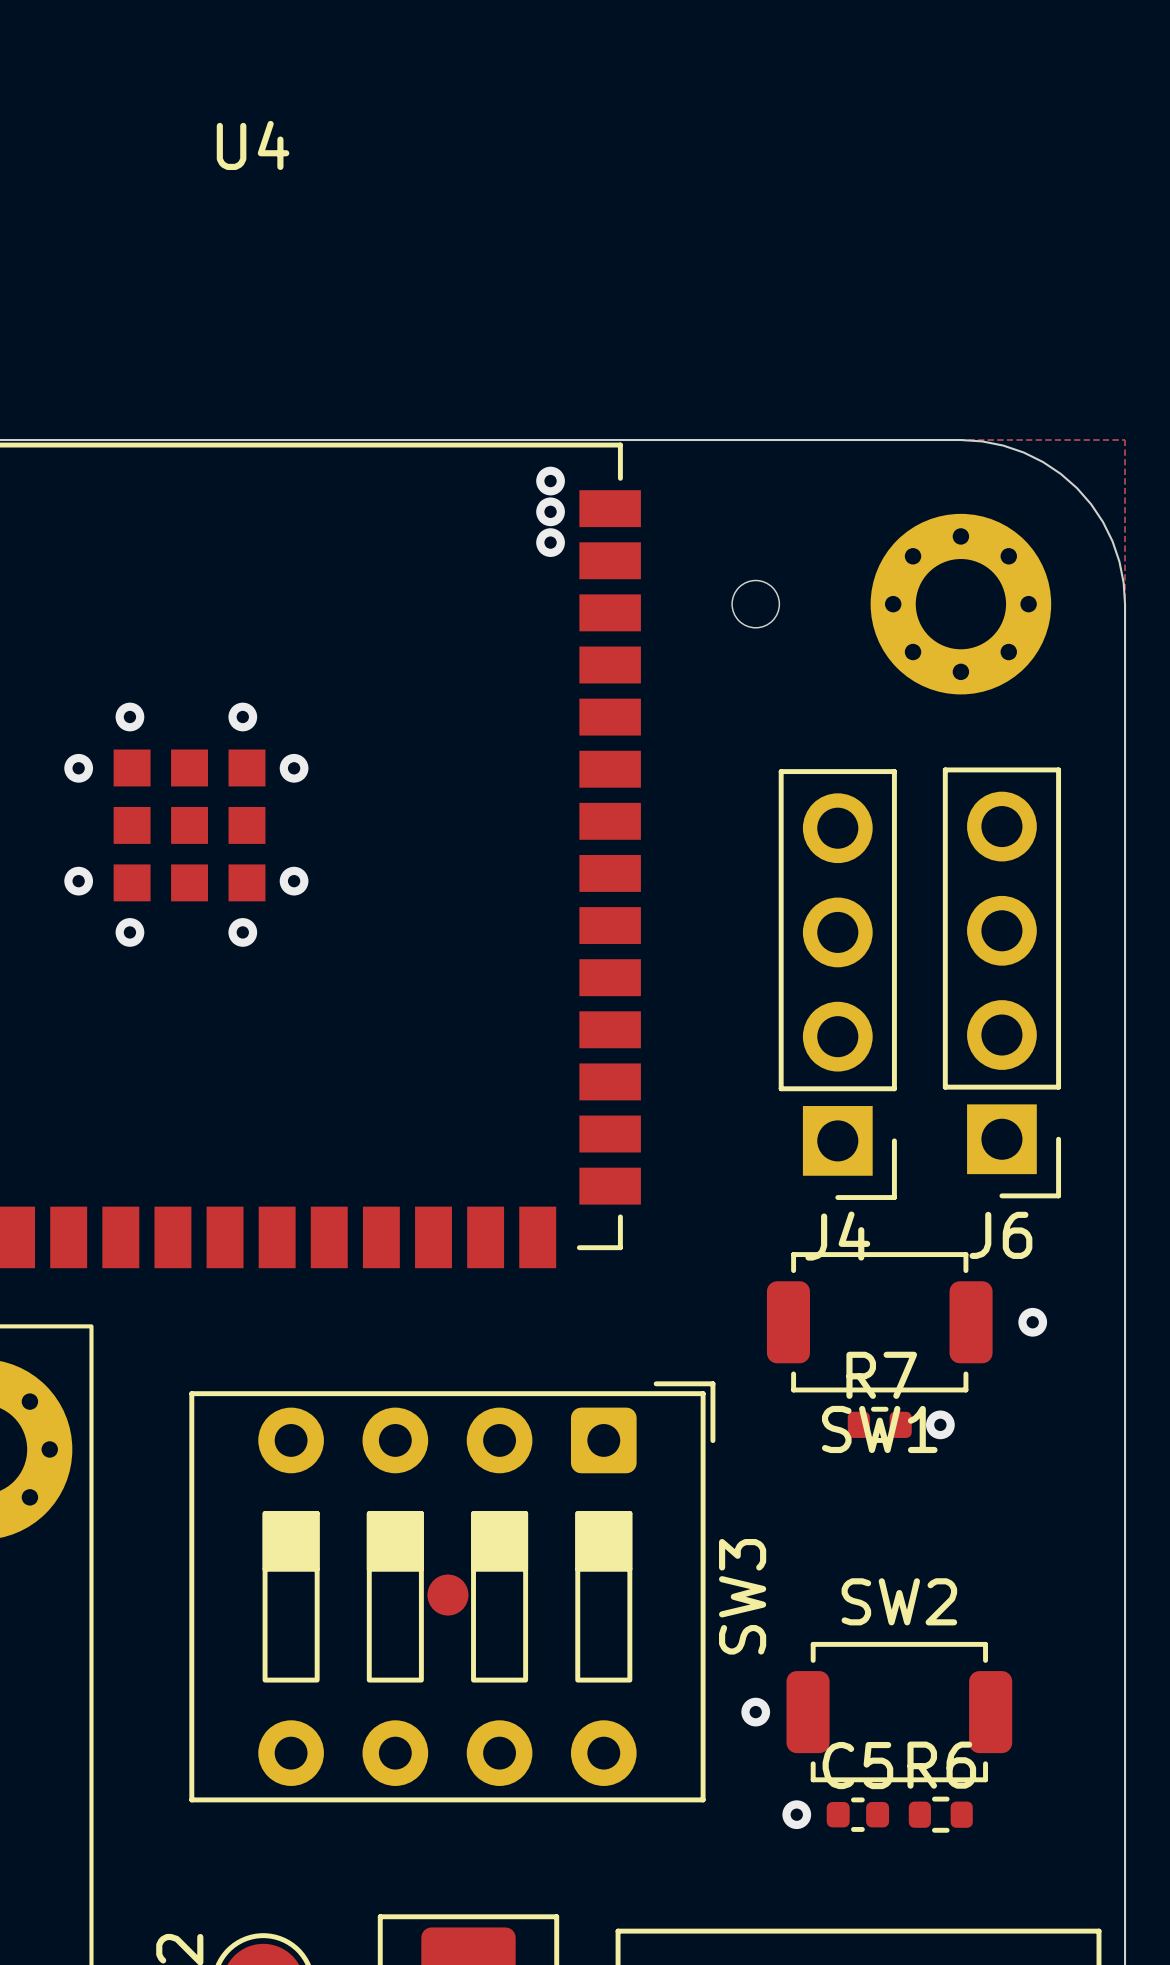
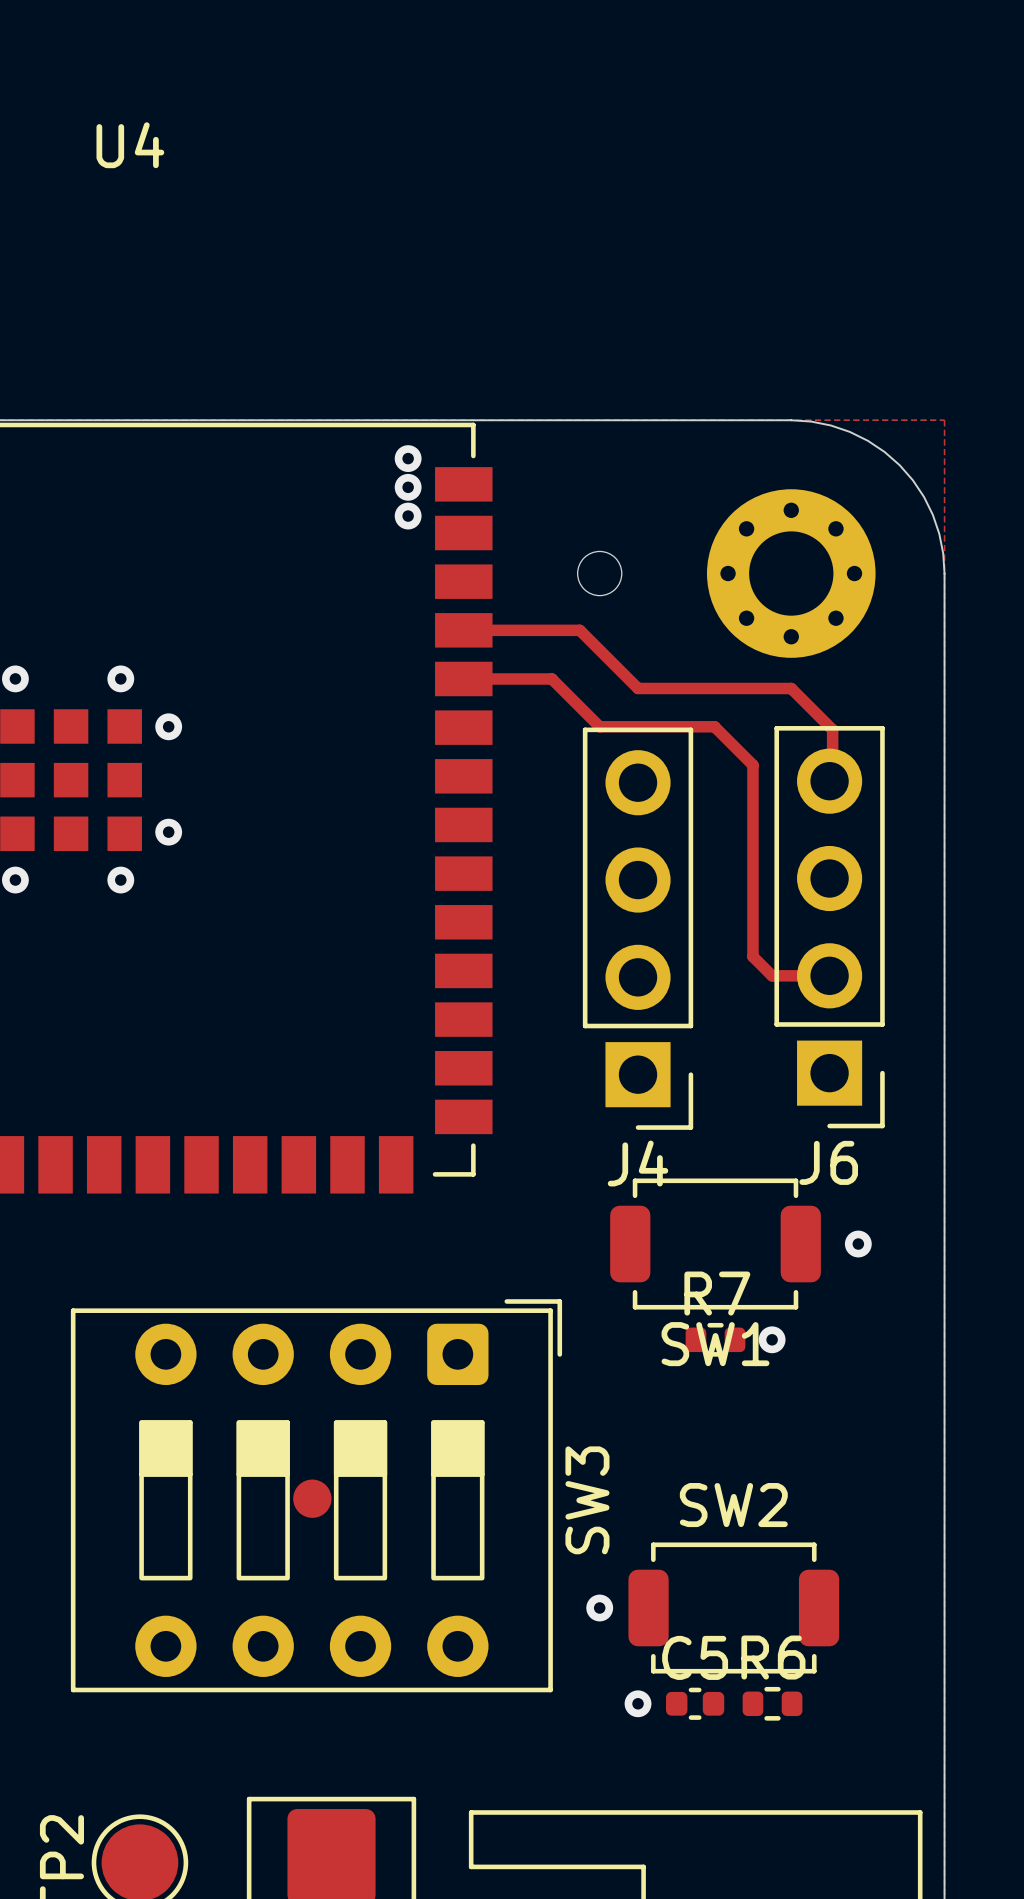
top track: none -> (463, 630) (579, 630) (638, 688) (791, 688) (832, 729) (832, 781)
top track: none -> (463, 678) (551, 678) (599, 726) (714, 726) (752, 765) (752, 956) (772, 975) (832, 975)
J4 position: (837, 984) -> (638, 928)

